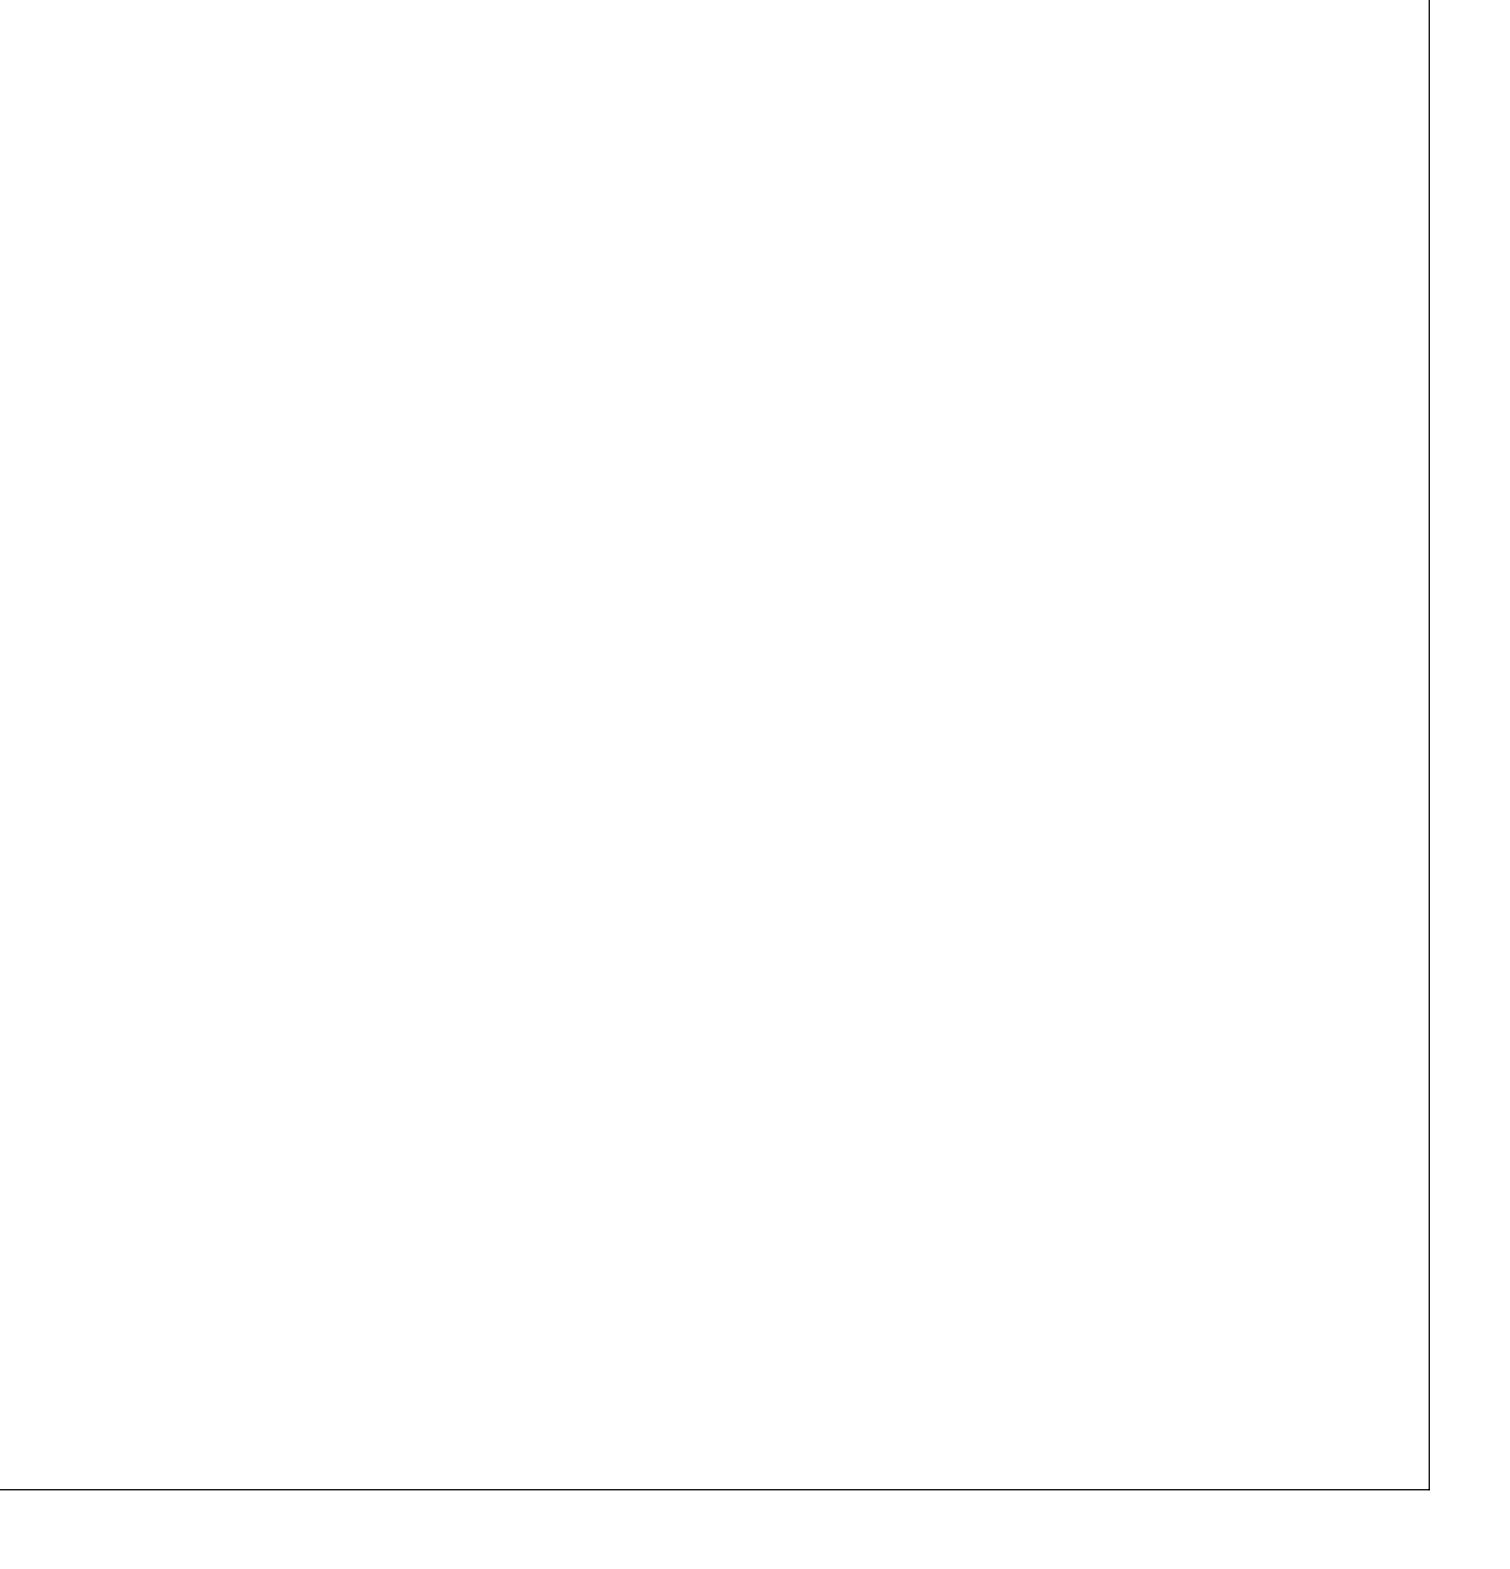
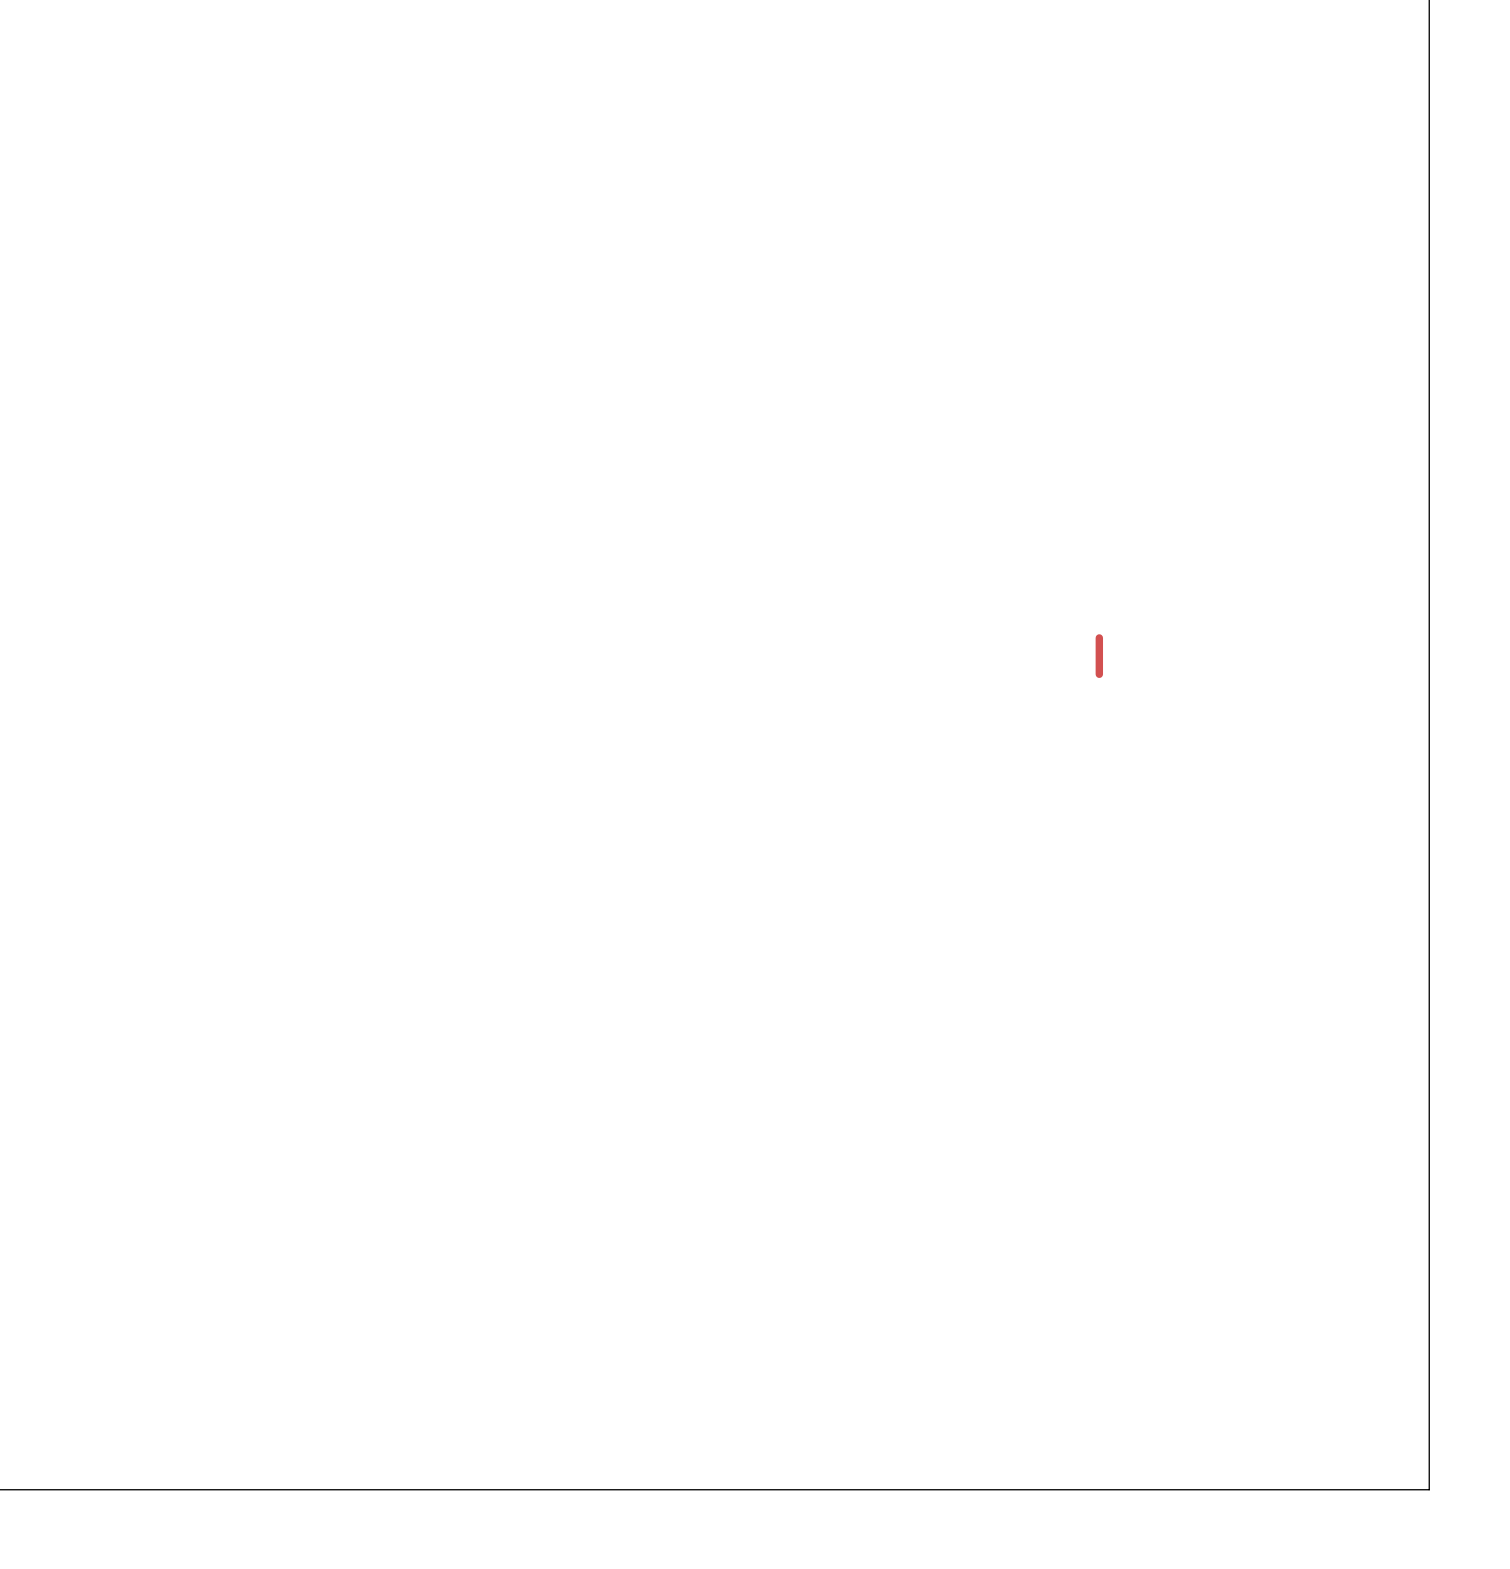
top track: none -> (1099, 637) (1099, 674)

